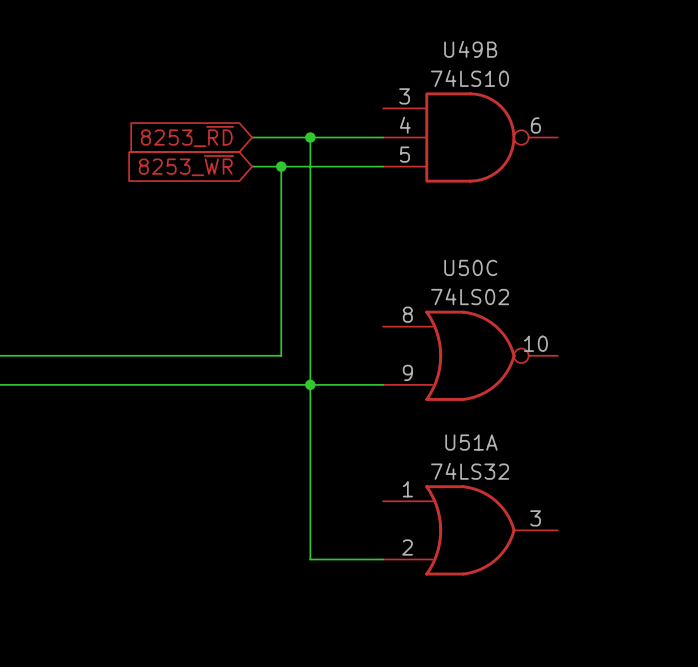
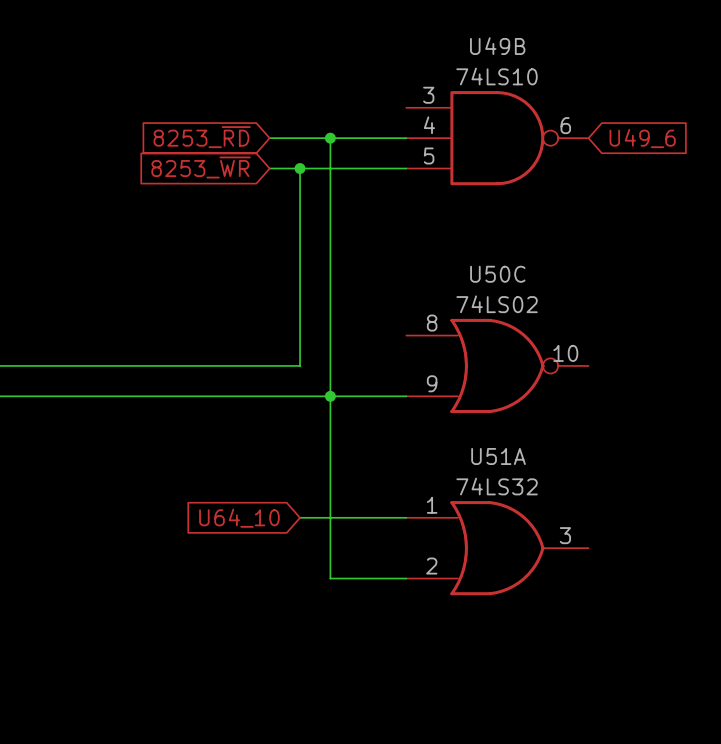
global label: none -> U49_6 (642, 138)
global label: none -> U64_10 (239, 518)
wire: none -> (300, 517) (406, 517)

